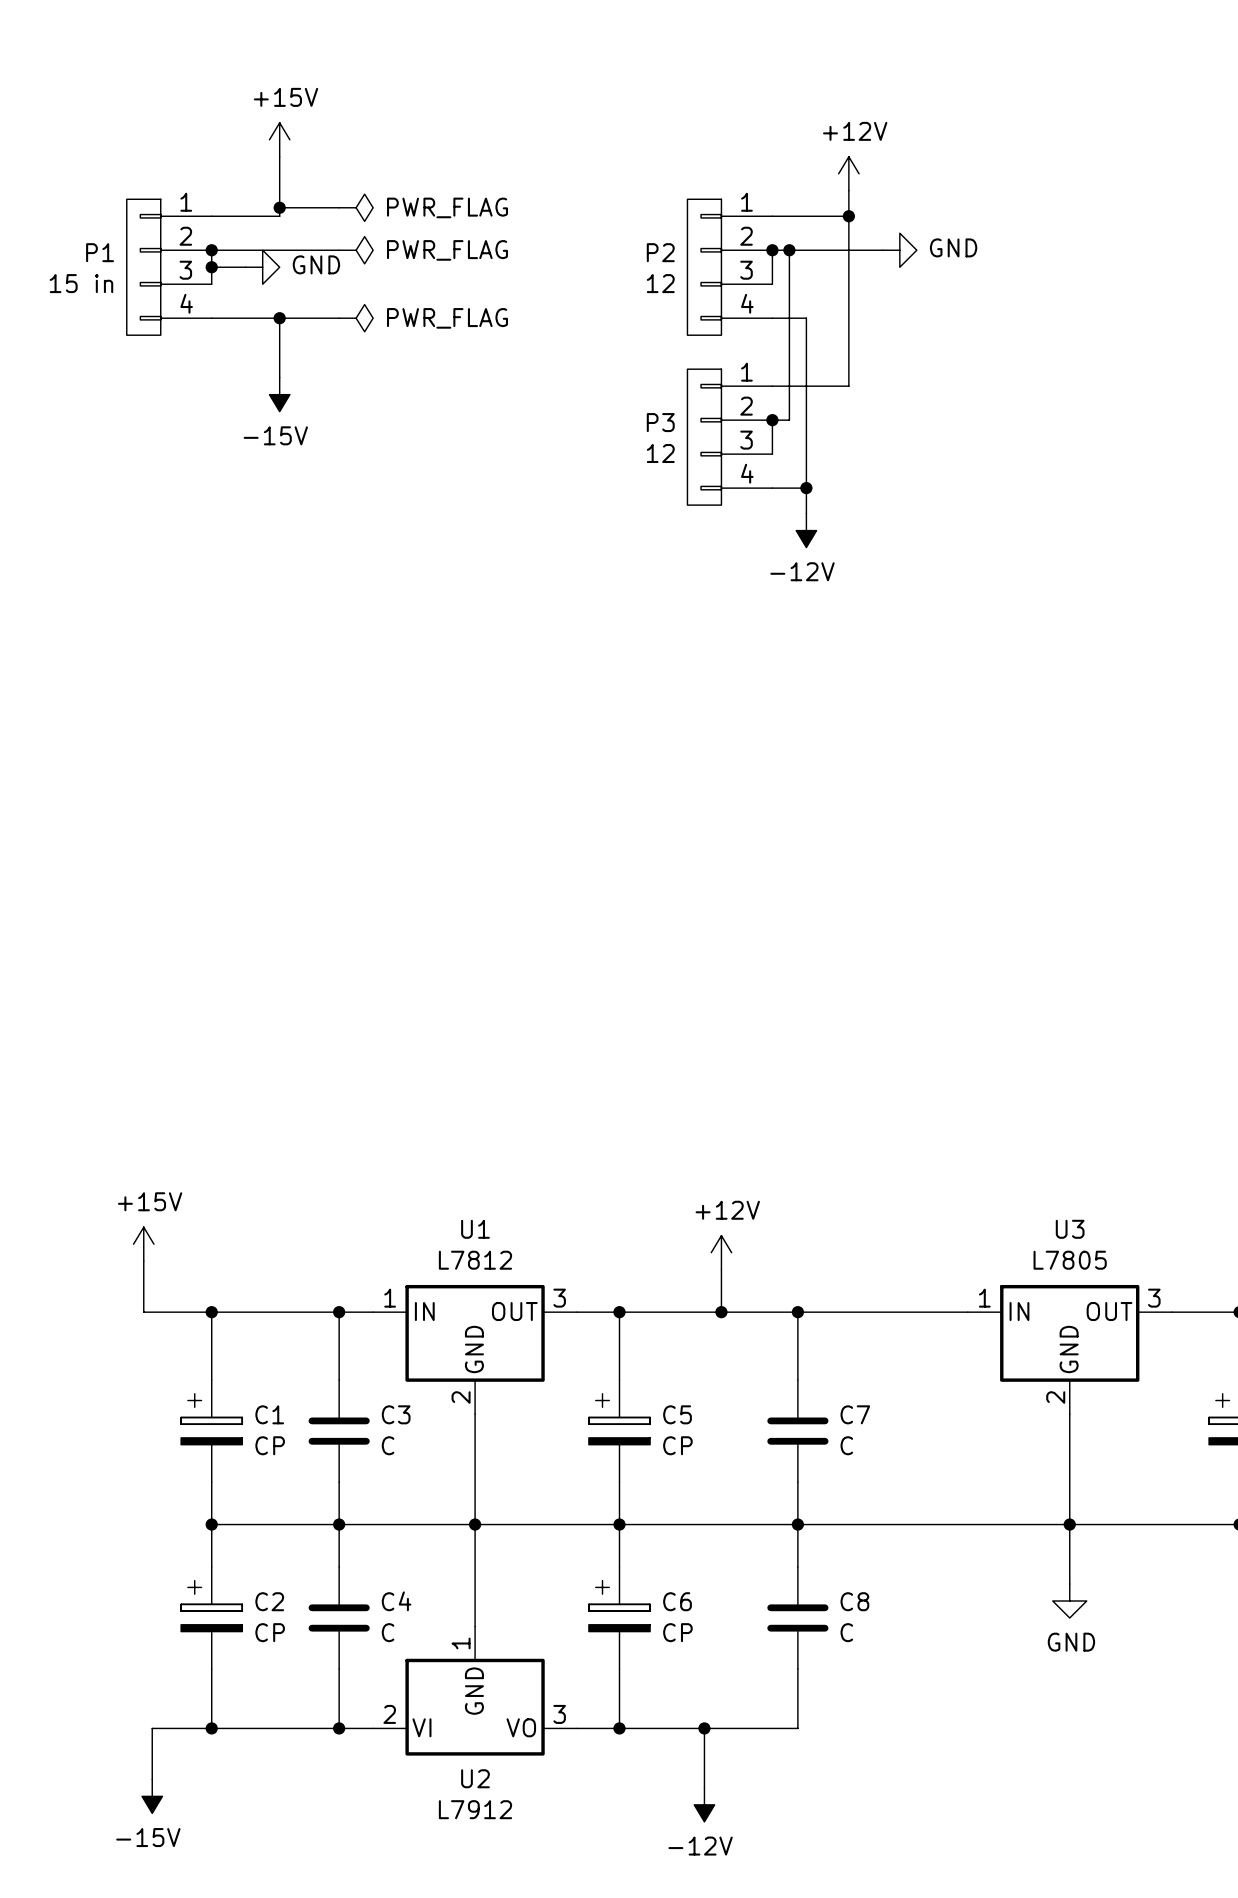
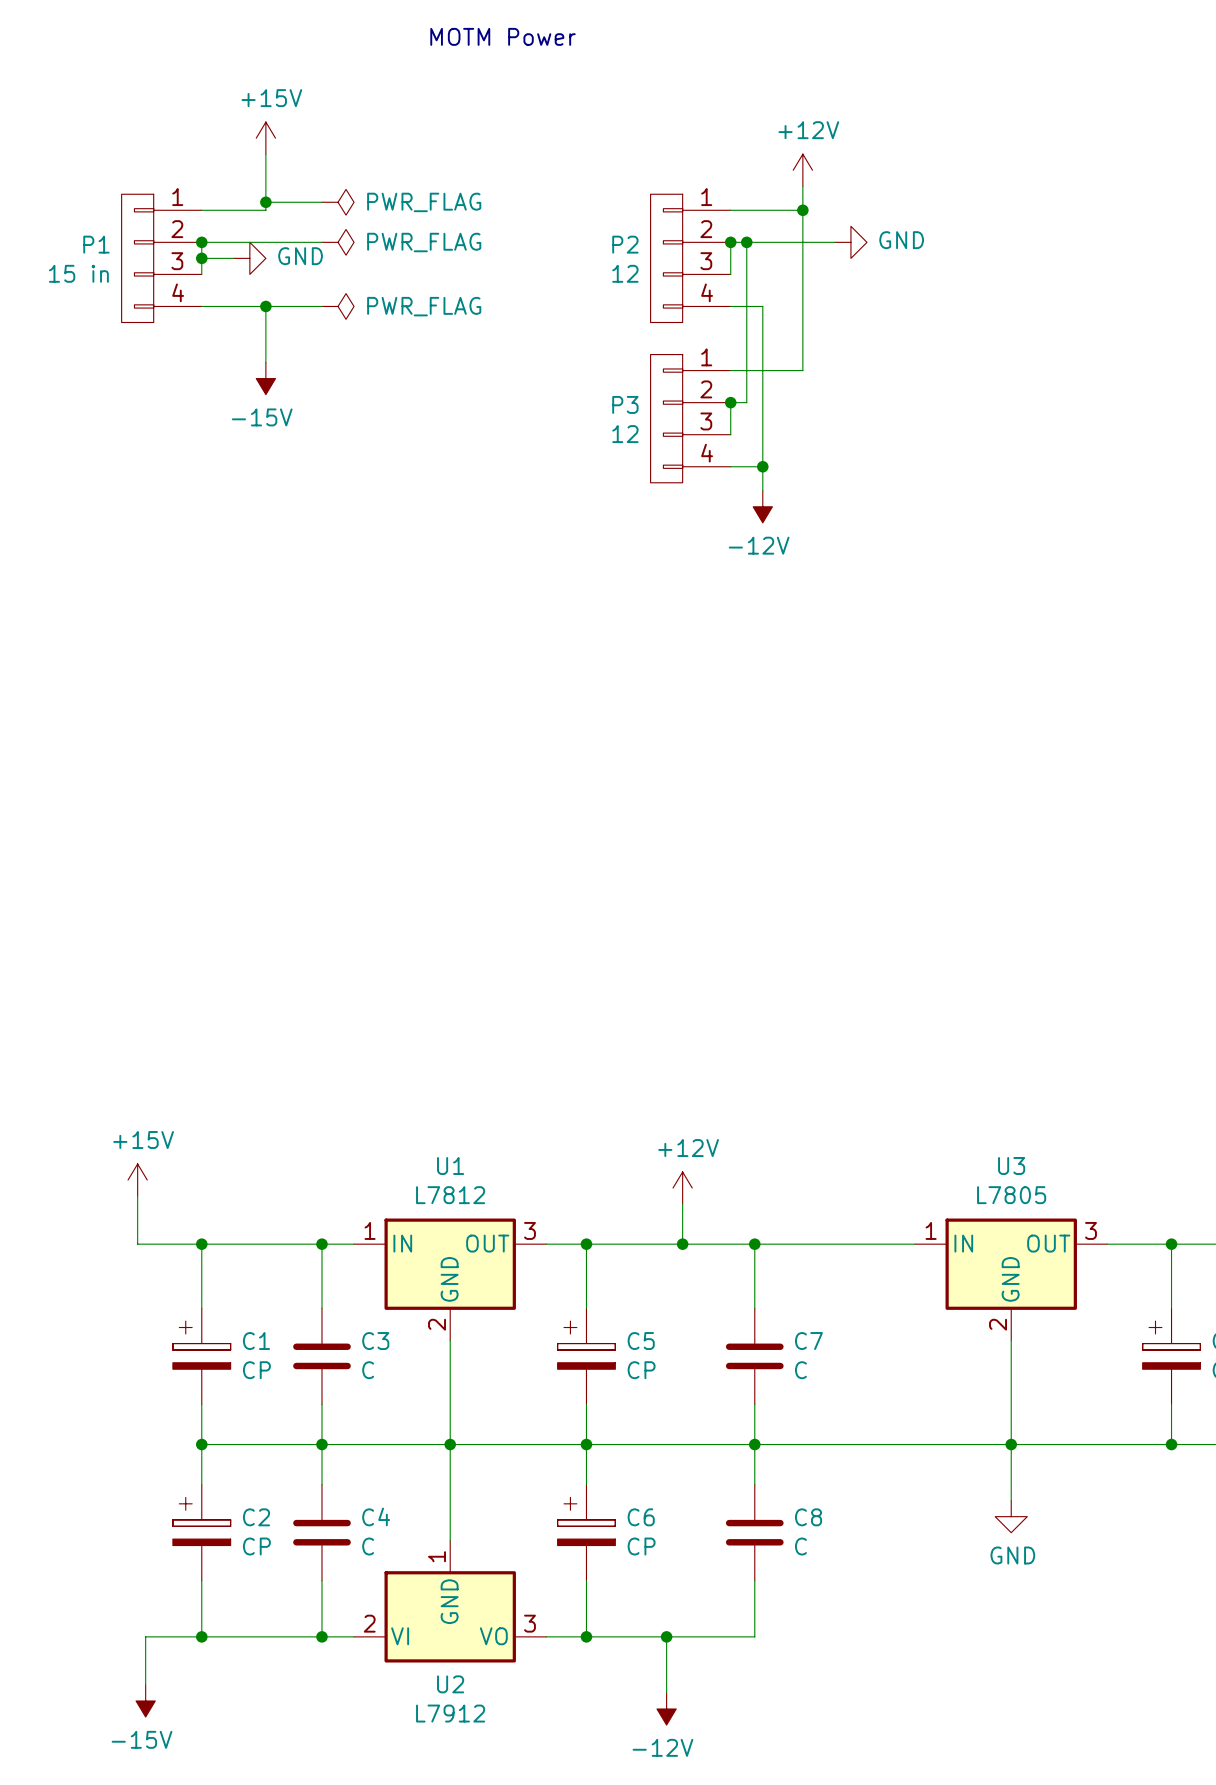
text: none -> MOTM Power (503, 36)

